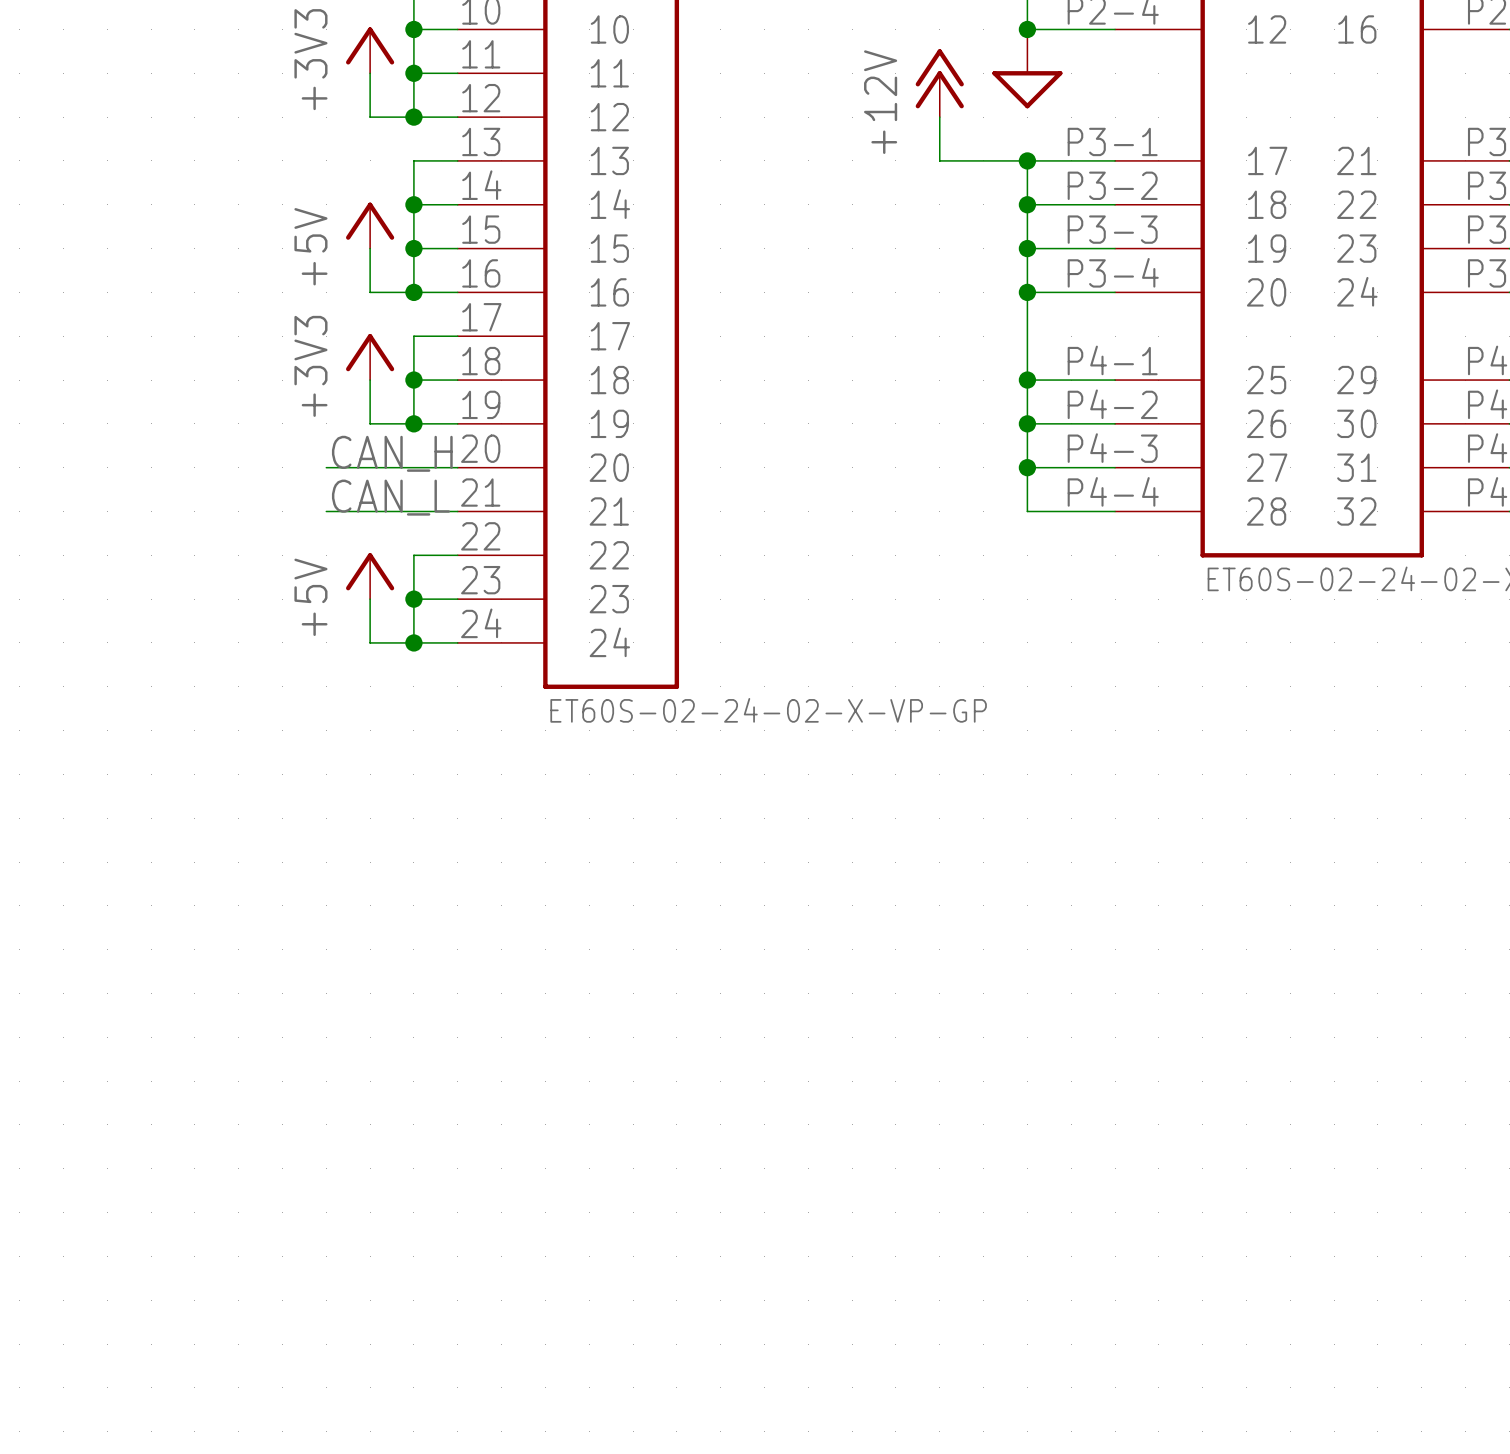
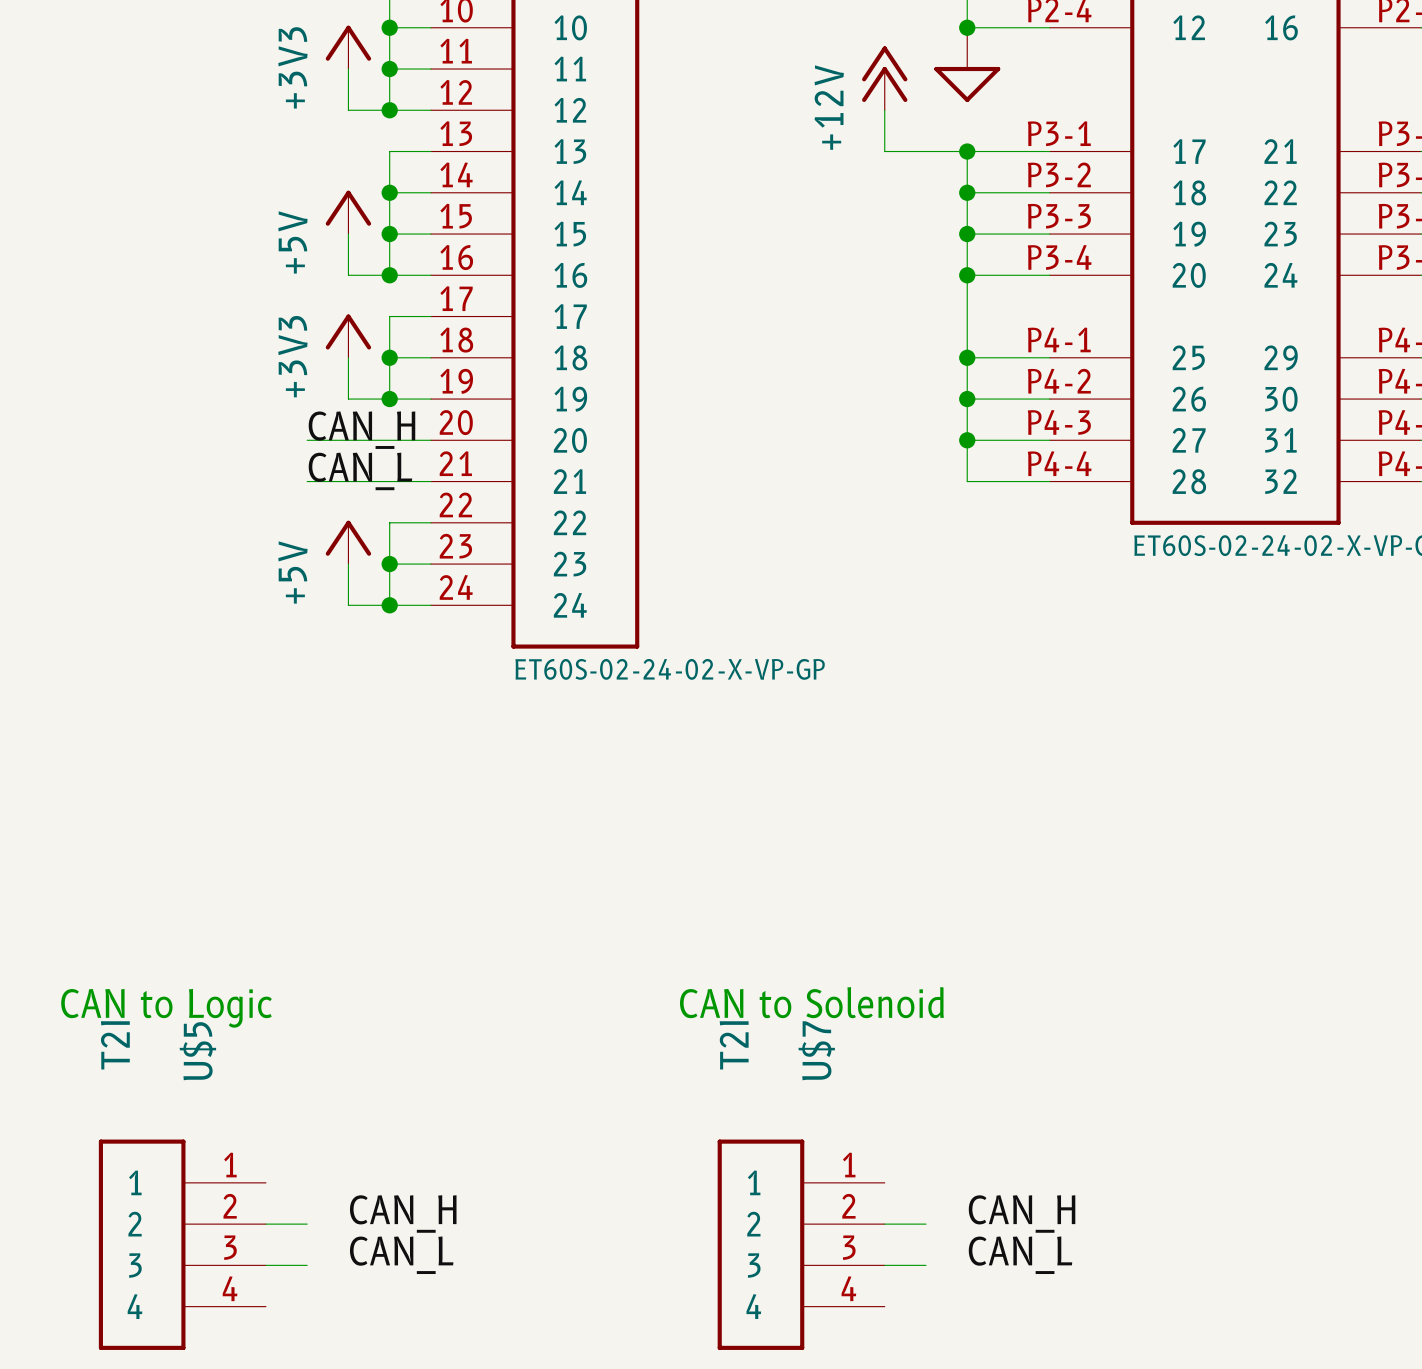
text: none -> CAN to Solenoid (811, 1002)
text: none -> CAN to Logic (166, 1008)
label: none -> CAN_H (403, 1214)
label: none -> CAN_H (1022, 1214)
wire: none -> (265, 1224) (307, 1224)
wire: none -> (884, 1224) (925, 1224)
U$5: none -> T2I (182, 1244)
U$7: none -> T2I (801, 1244)
label: none -> CAN_L (401, 1255)
label: none -> CAN_L (1020, 1255)
wire: none -> (265, 1265) (307, 1265)
wire: none -> (884, 1265) (925, 1265)

